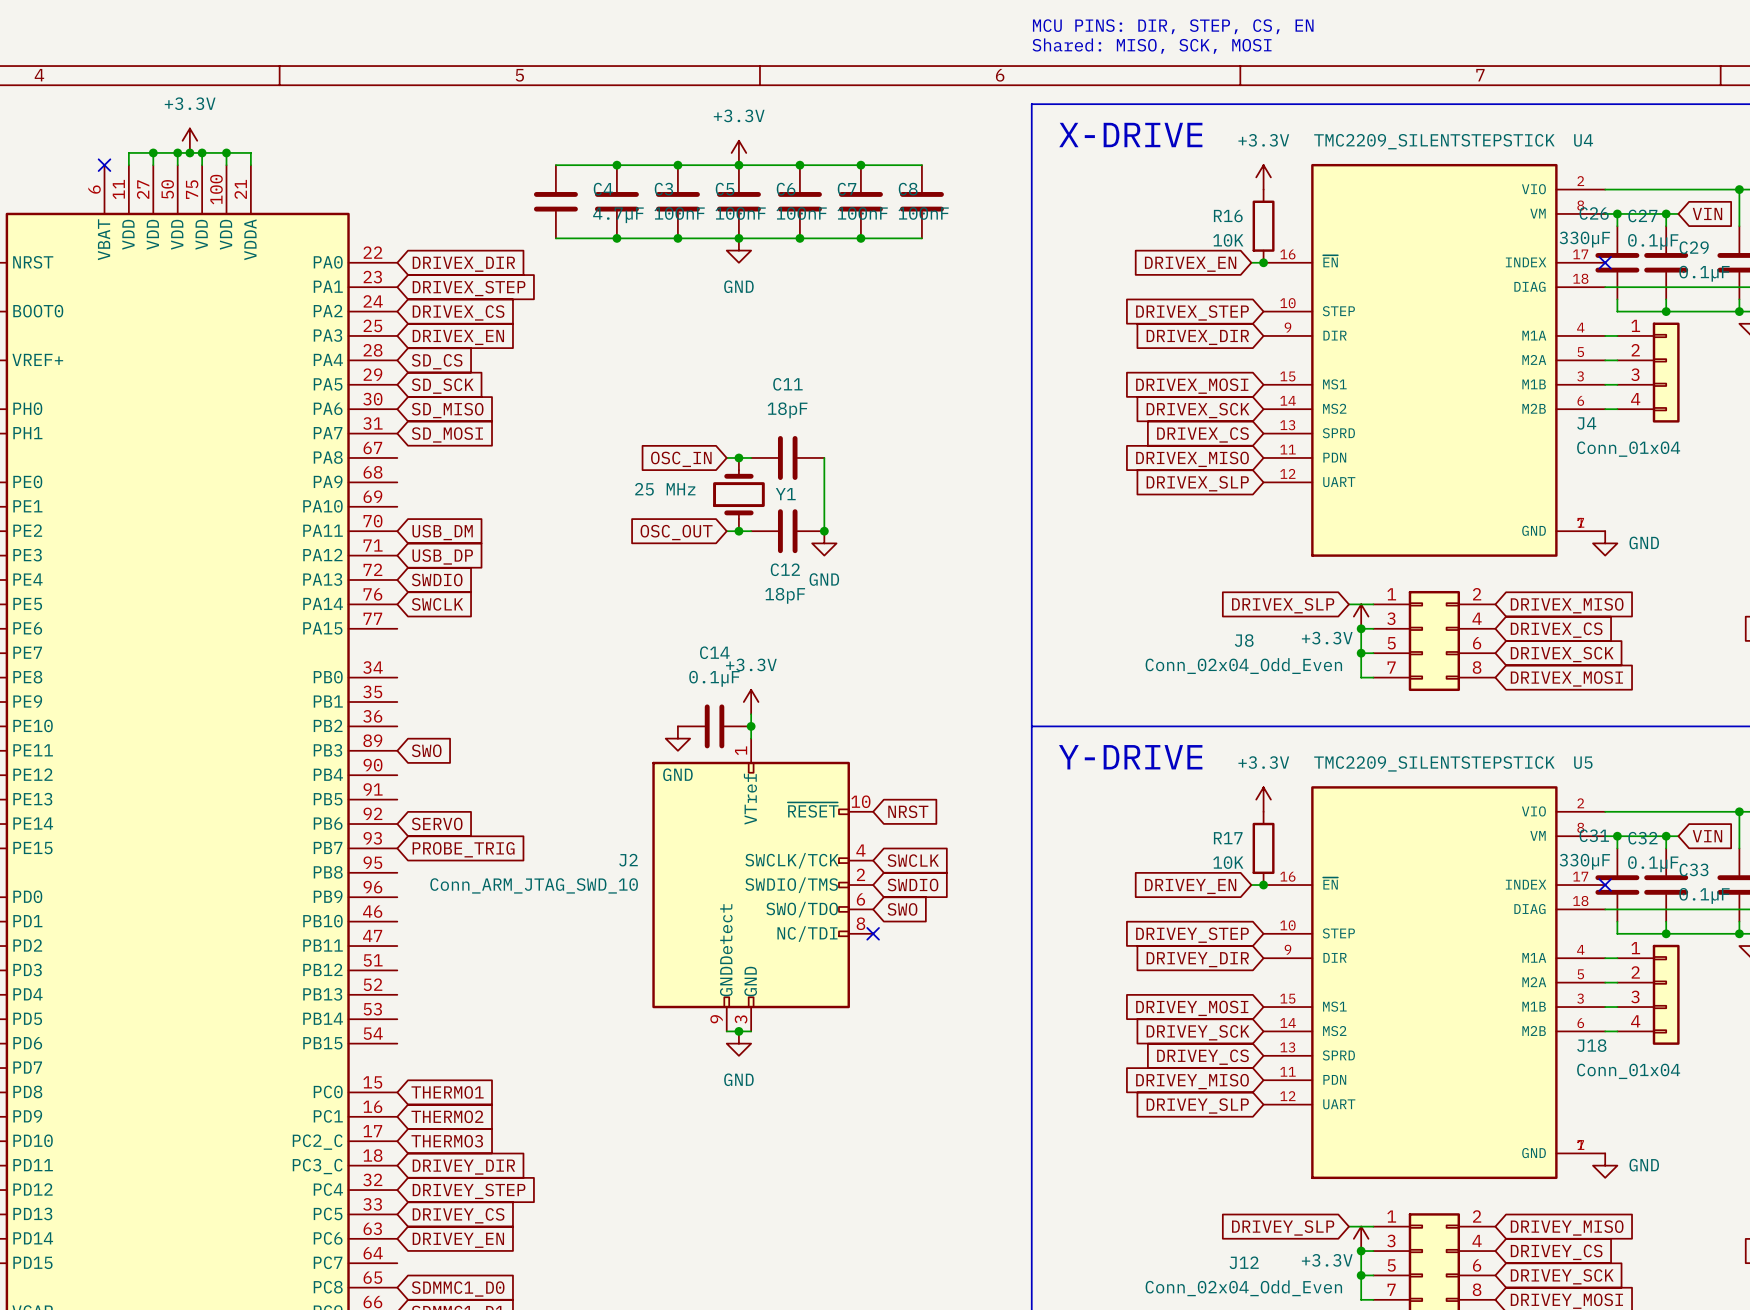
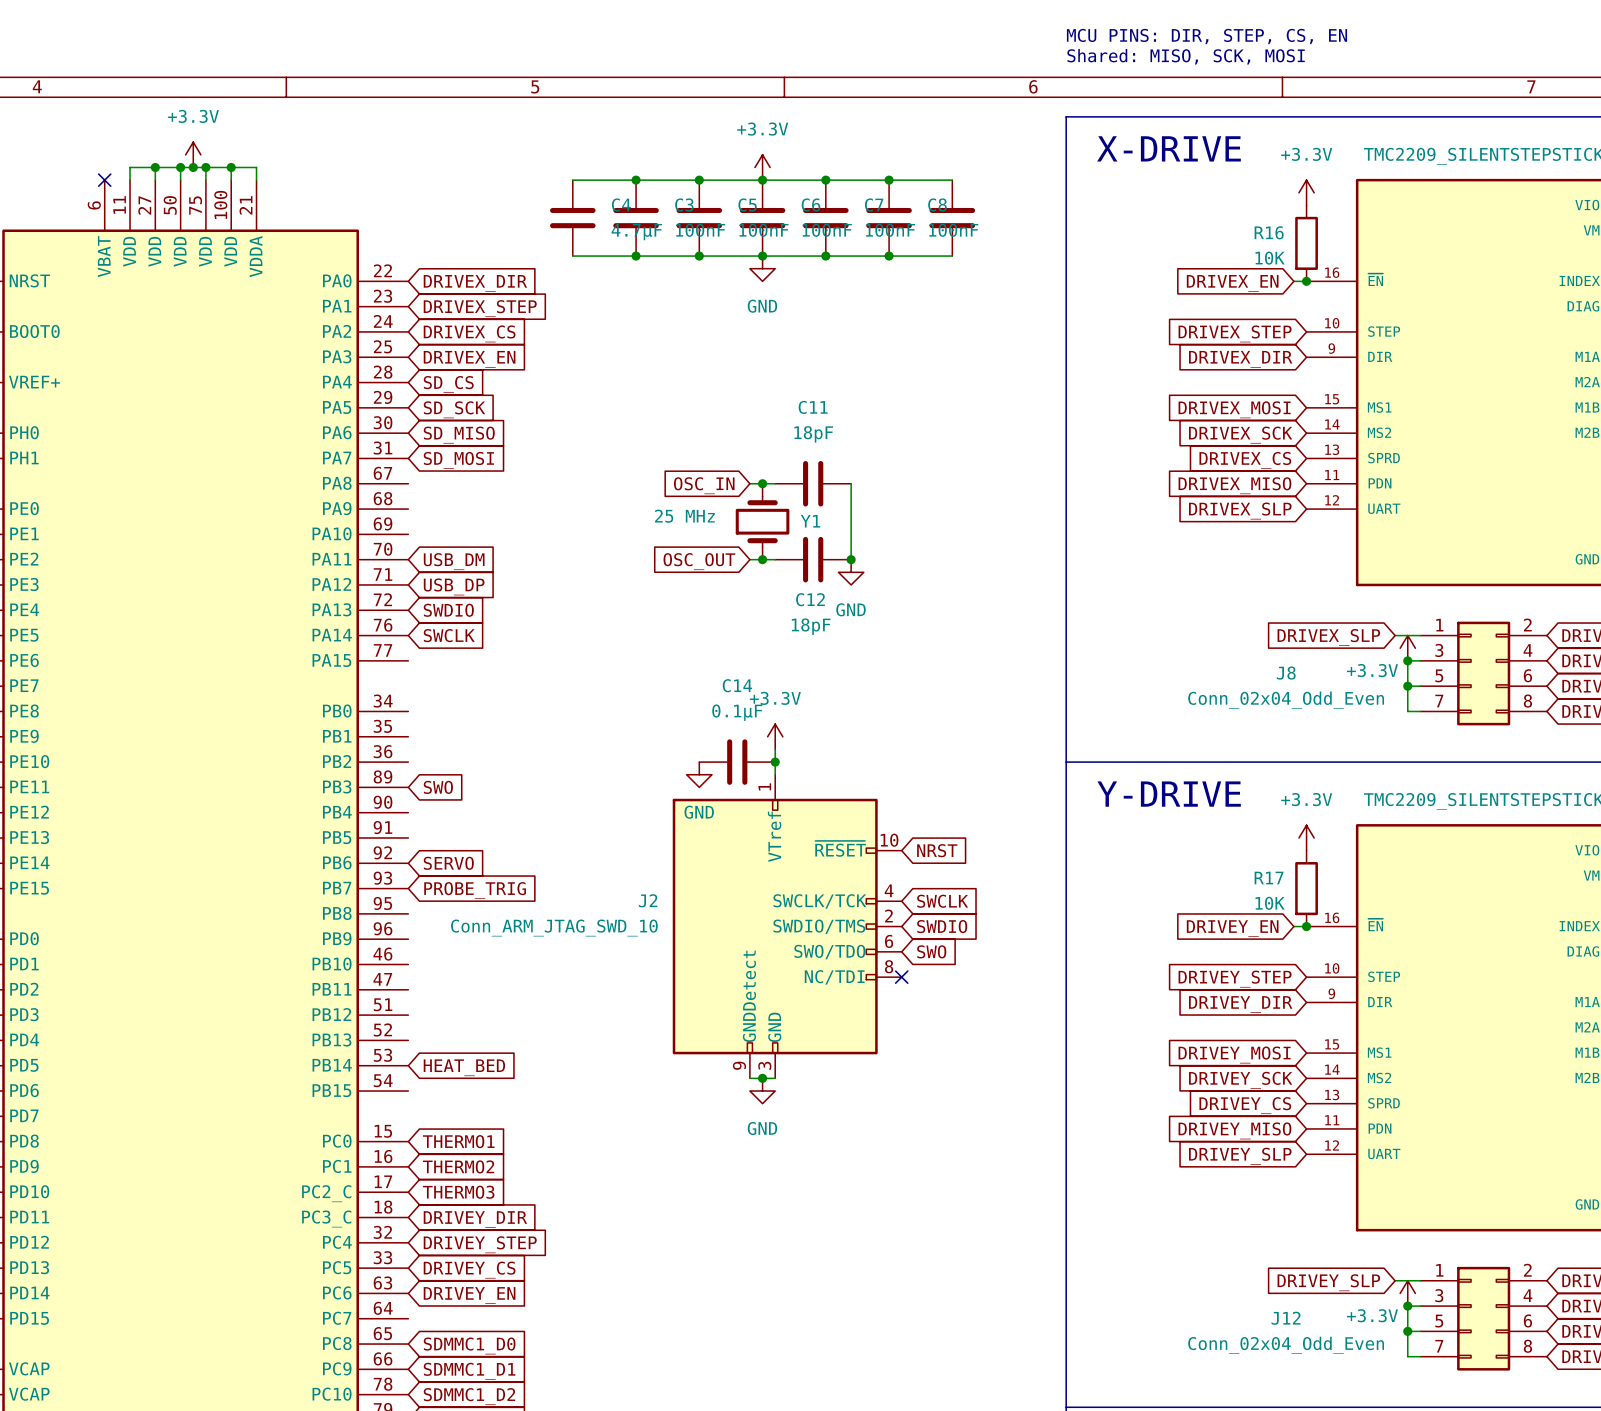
global label: none -> HEAT_BED (464, 1067)

